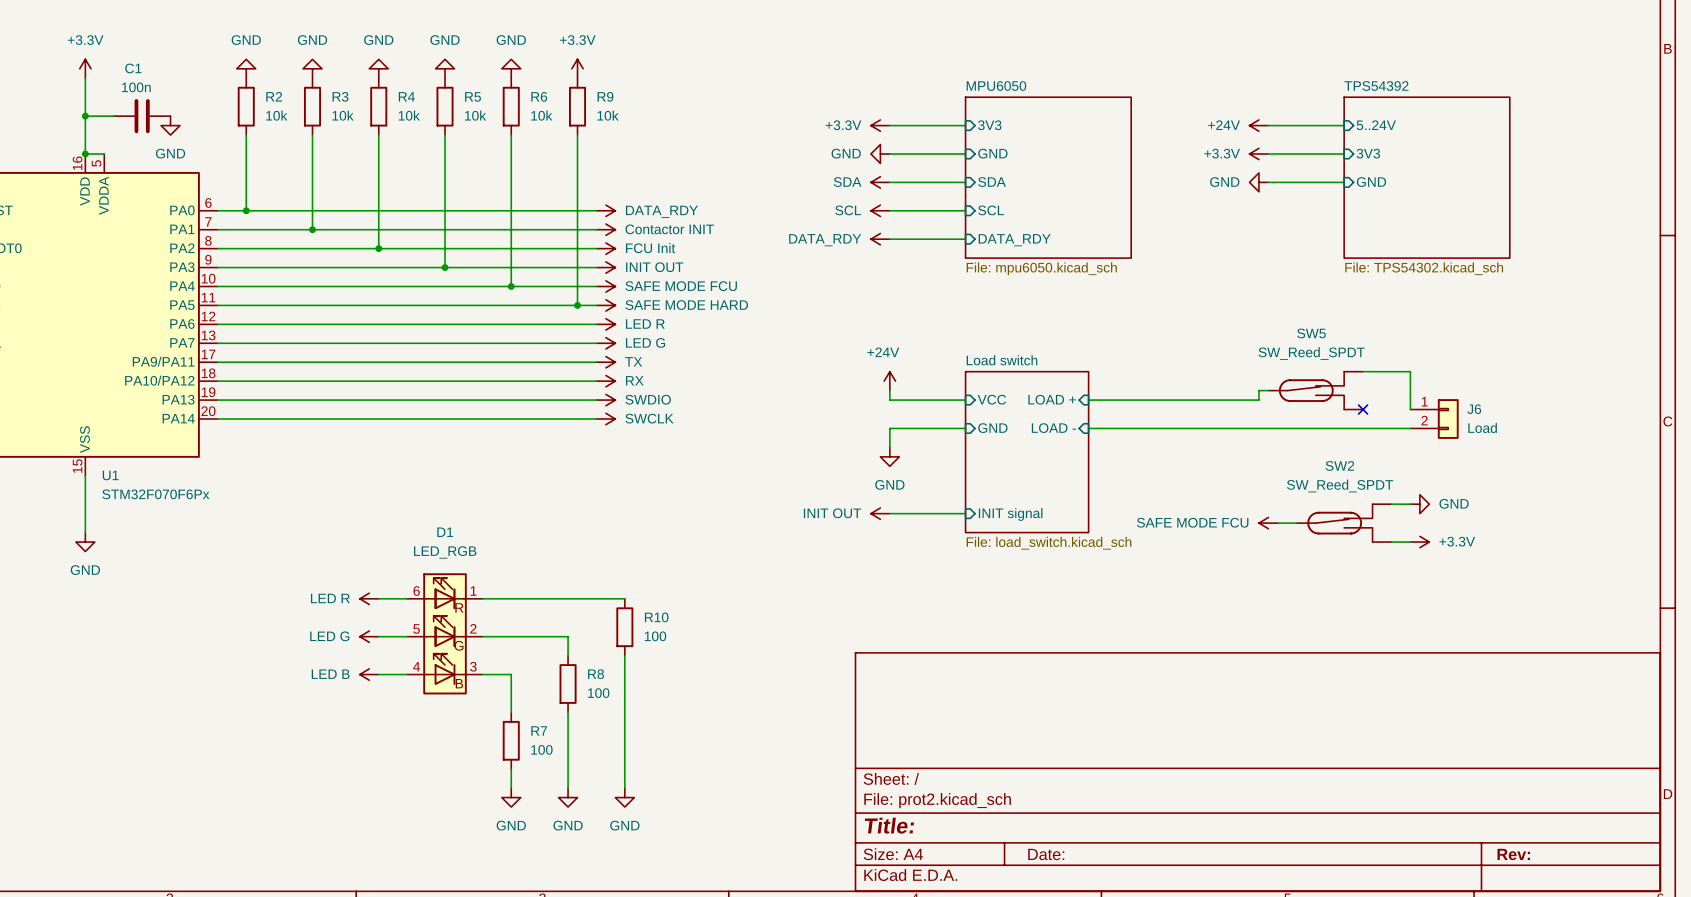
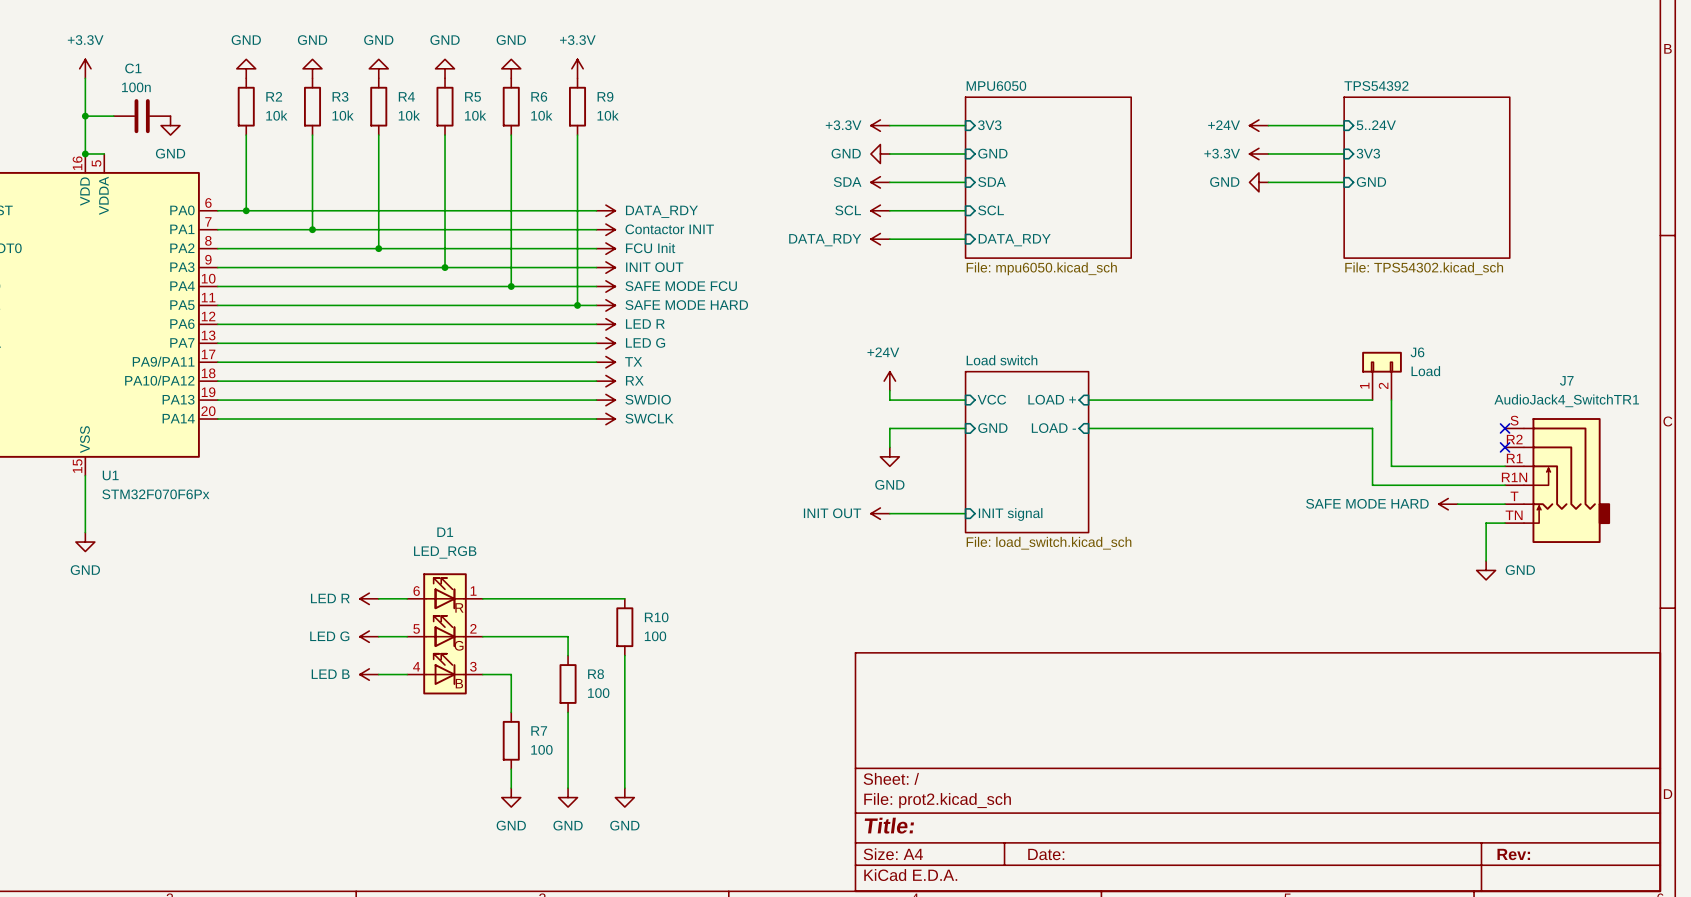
wire: (1363, 371) (1410, 371) (1410, 409) -> none
wire: (1268, 390) (1258, 390) (1258, 400) -> (1372, 400) (1258, 400)
SW5: SW_Reed_SPDT (1315, 390) -> none
wire: none -> (1391, 400) (1391, 466) (1505, 466)
no-connect mark: (1363, 409) -> none
J6 position: (1434, 419) -> (1382, 375)
J6 rotation: 0° (1448, 419) -> 90° counterclockwise (1382, 362)
wire: (1372, 428) (1410, 428) -> (1372, 428) (1372, 485) (1505, 485)
no-connect mark: none -> (1505, 428)
no-connect mark: none -> (1505, 447)
J7: none -> AudioJack4_SwitchTR1 (1557, 480)
wire: (1391, 504) (1410, 504) -> none
power symbol rotation: 0° (1419, 504) -> 90° clockwise (1486, 570)
power symbol position: GND (1419, 504) -> GND (1486, 570)
power symbol: none -> SAFE MODE HARD (1448, 504)
wire: none -> (1457, 504) (1505, 504)
power symbol: SAFE MODE FCU (1268, 523) -> none
wire: (1277, 523) (1296, 523) -> none
SW2: SW_Reed_SPDT (1344, 523) -> none
wire: none -> (1505, 523) (1486, 523) (1486, 560)
wire: (1391, 542) (1410, 542) -> none
power symbol: +3.3V (1419, 542) -> none

